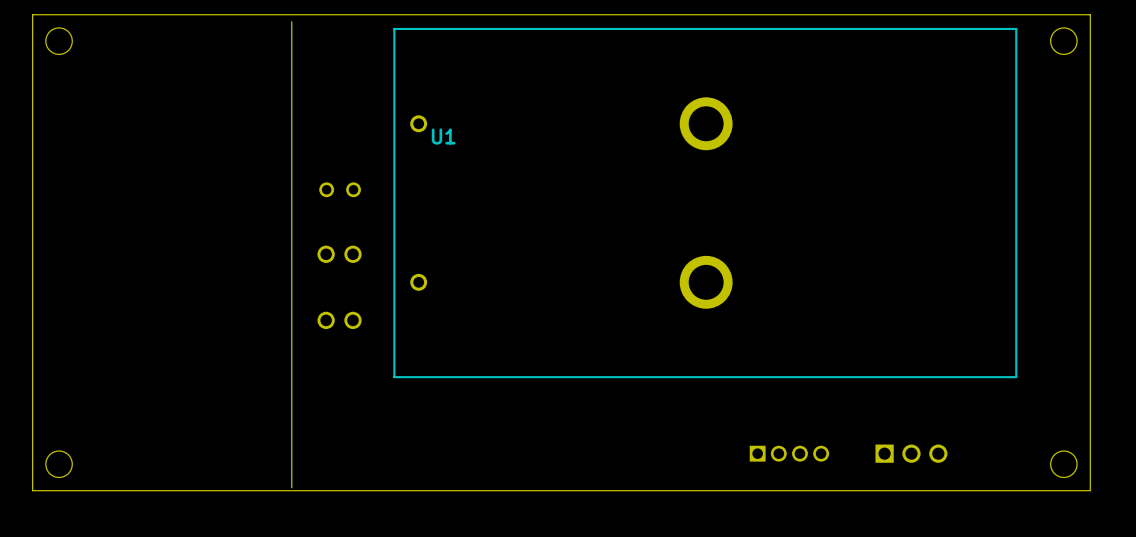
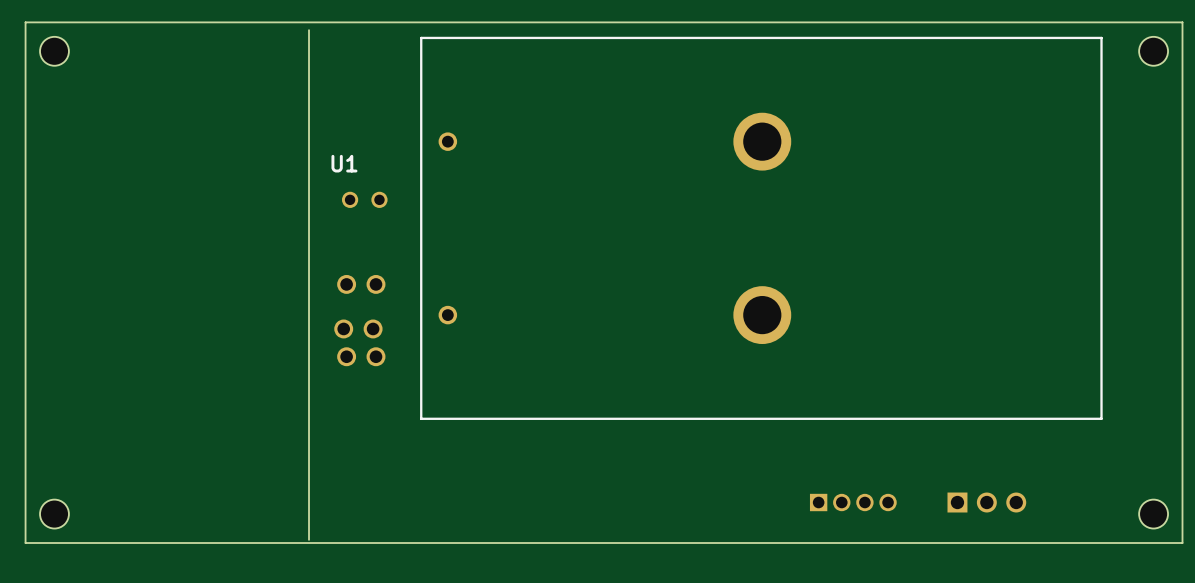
U1 name position: U1 (443, 136) -> U1 (344, 163)
part position: (340, 189) -> (364, 199)
part: none -> (358, 328)

